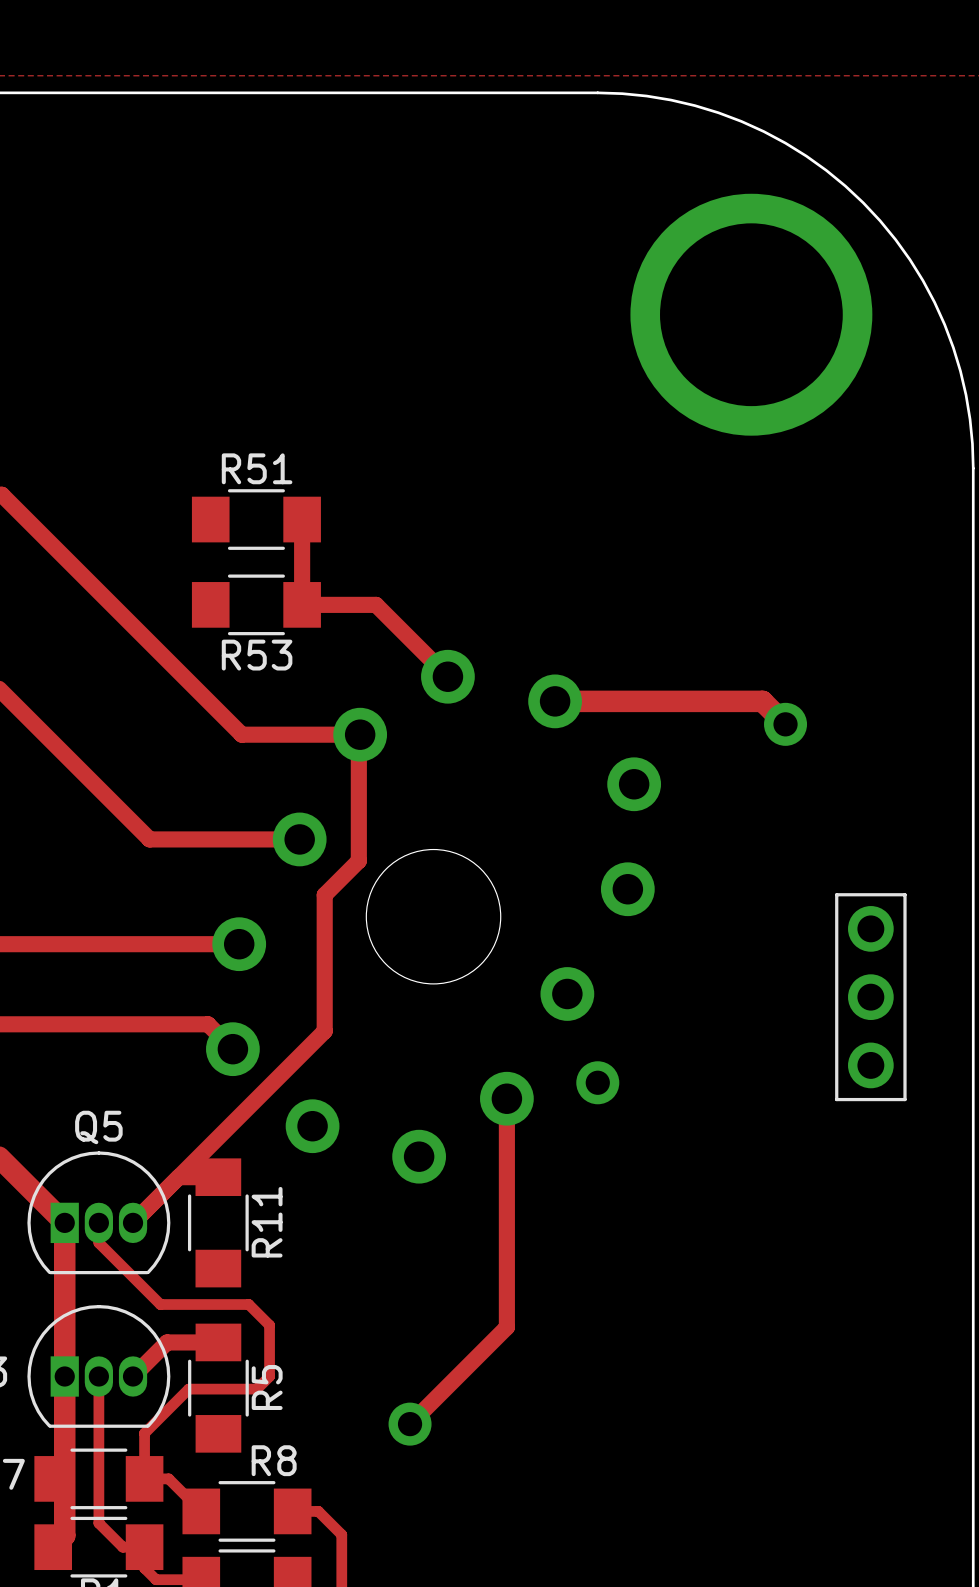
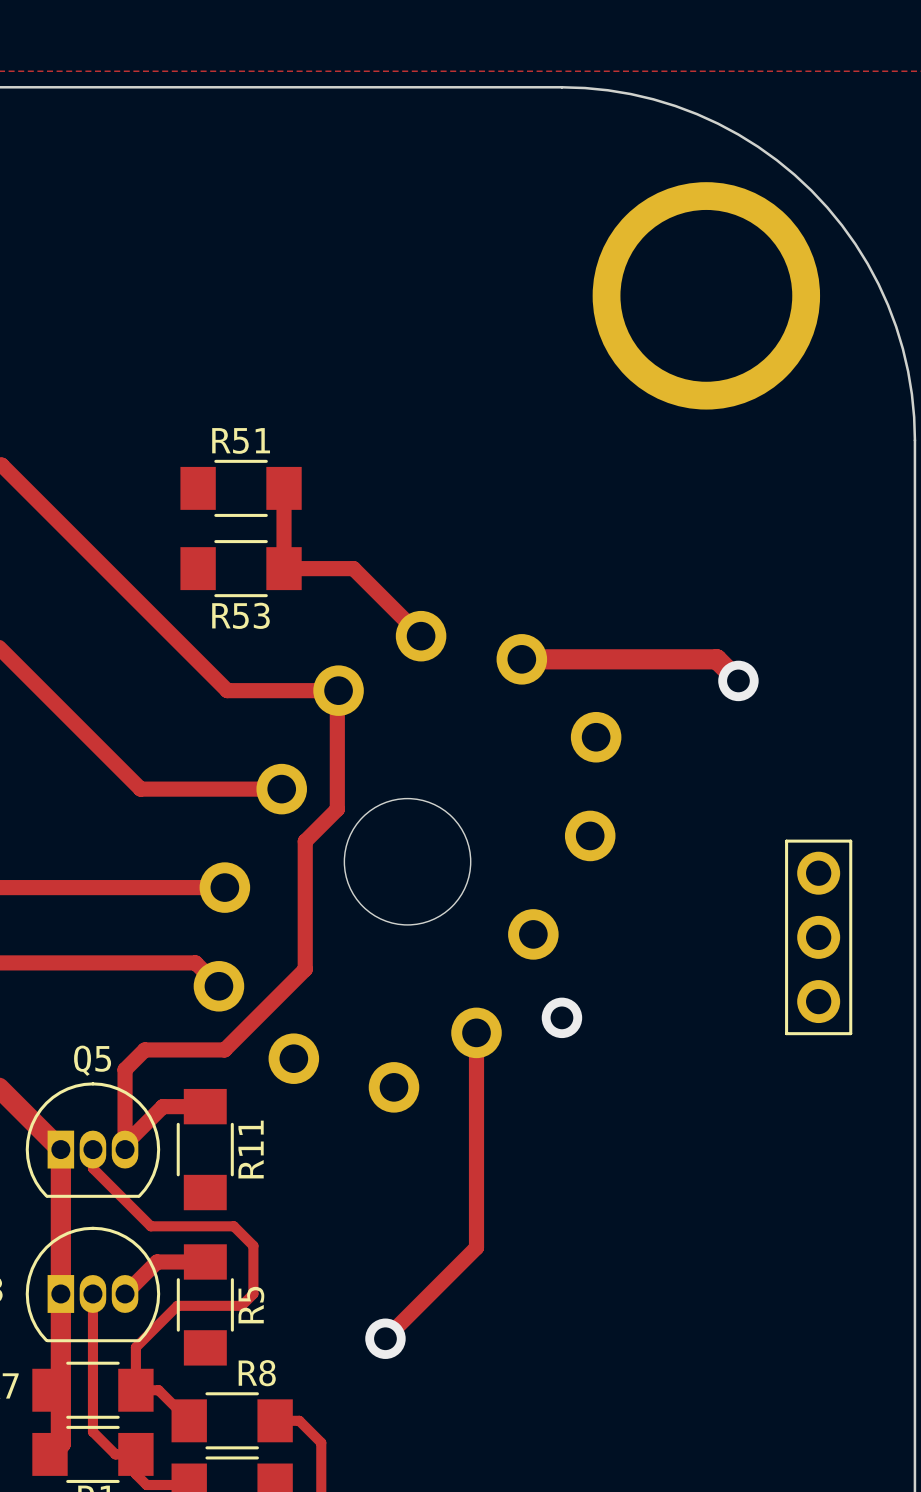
track: (239, 1116) (133, 1222) -> (224, 1049) (144, 1049) (125, 1069) (125, 1144) (162, 1106) (168, 1106)

